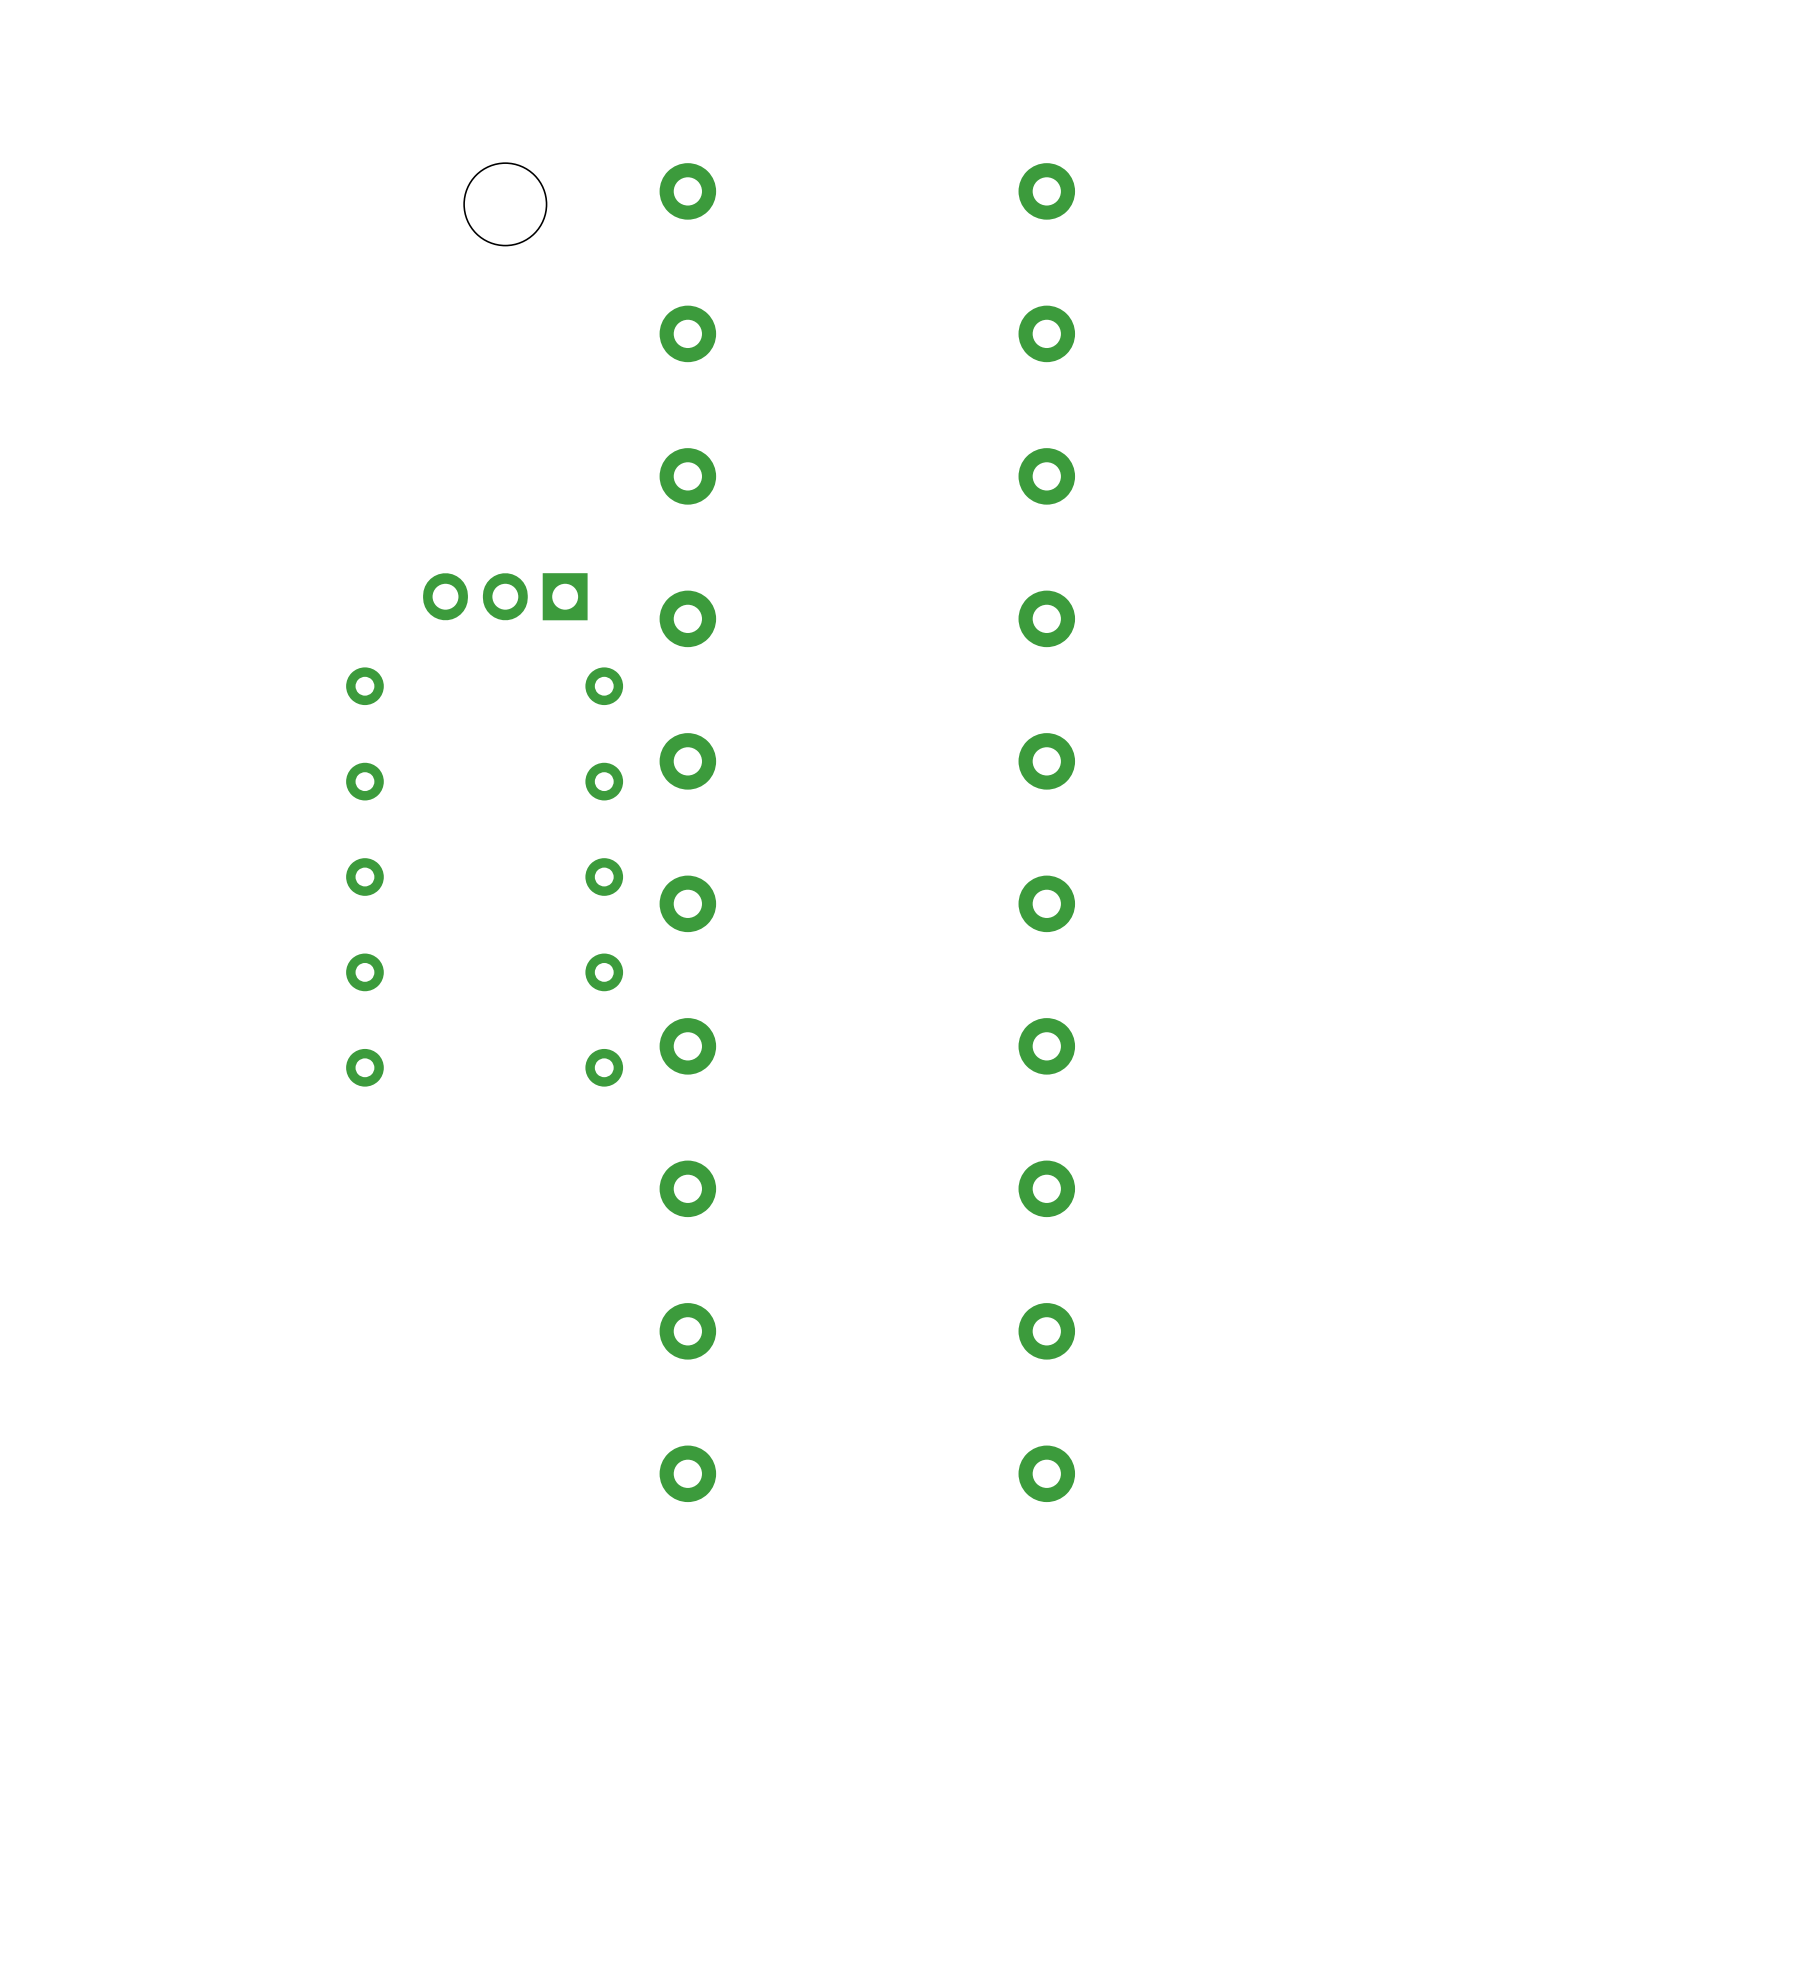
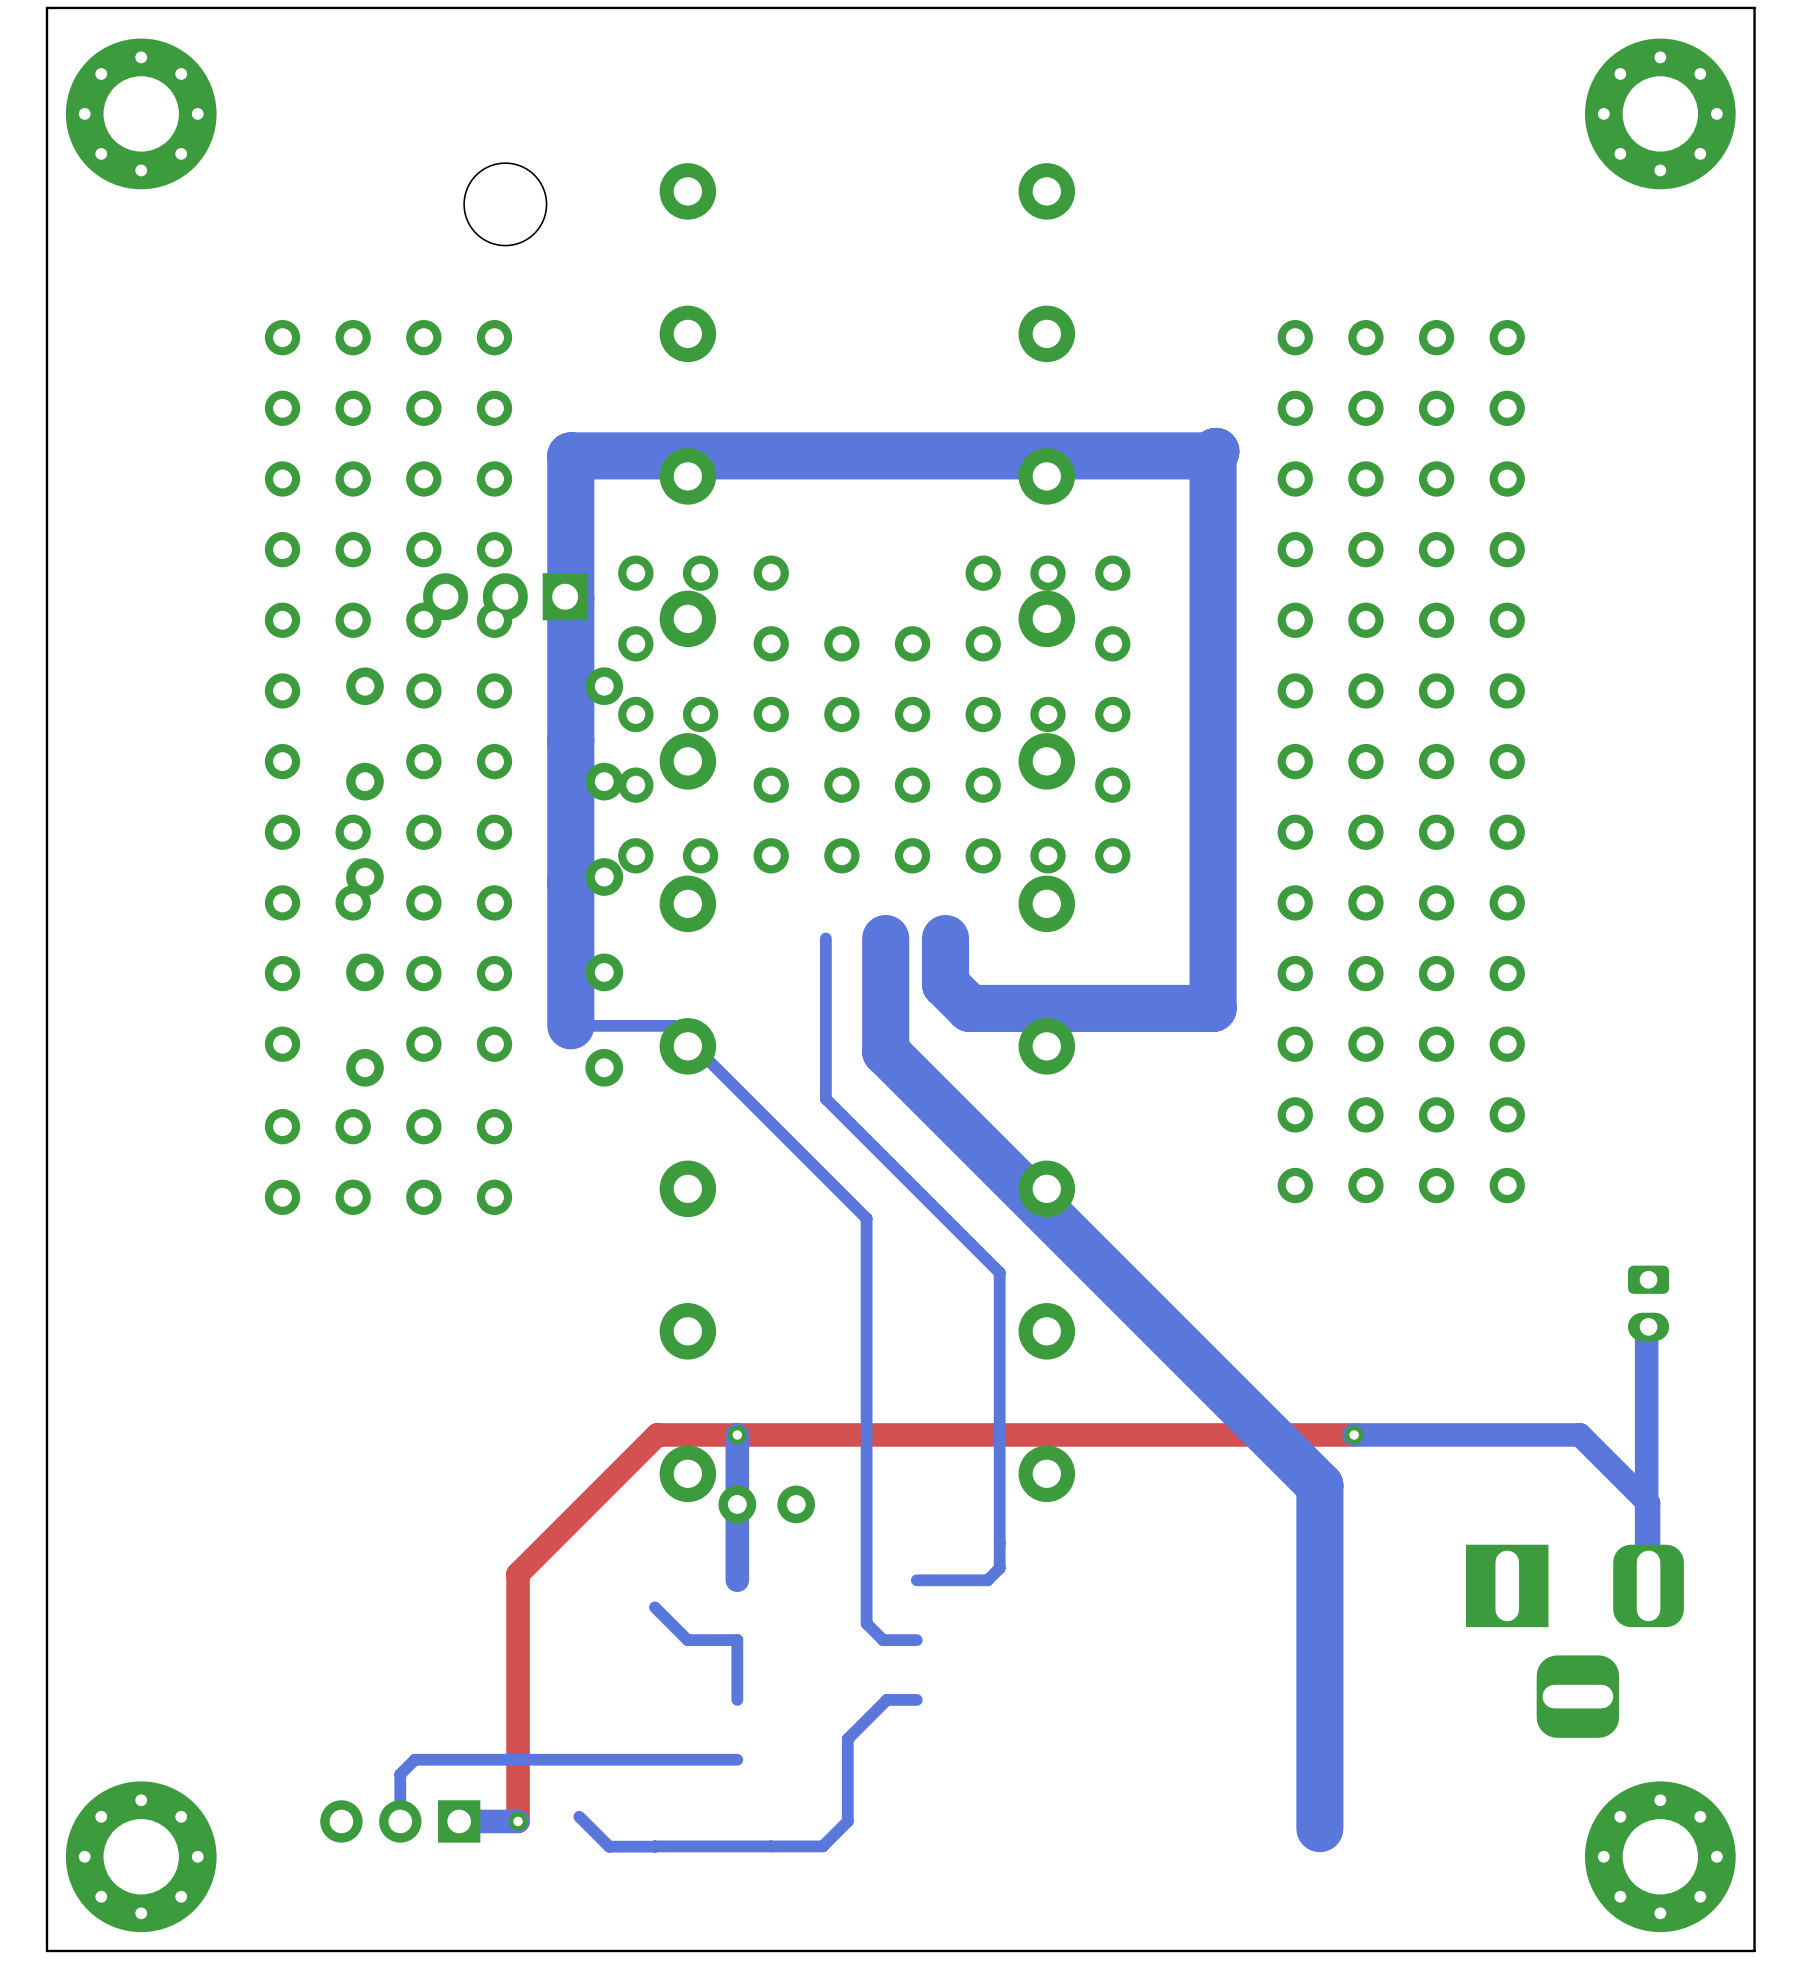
board edge: none -> (1754, 7) (47, 7) (47, 1950) (1754, 1950) (1754, 7)
part: none -> (141, 113)
part: none -> (1660, 113)
via: none -> (282, 337)
via: none -> (353, 337)
via: none -> (423, 337)
via: none -> (494, 337)
via: none -> (1295, 337)
via: none -> (1365, 337)
via: none -> (1436, 337)
via: none -> (1507, 337)
via: none -> (282, 408)
via: none -> (353, 408)
via: none -> (423, 408)
via: none -> (494, 408)
via: none -> (1295, 408)
via: none -> (1365, 408)
via: none -> (1436, 408)
via: none -> (1507, 408)
bottom track: none -> (1215, 451) (1211, 455) (570, 455) (570, 1025) (673, 1025) (866, 1218) (866, 1623) (883, 1640) (916, 1640)
bottom track: none -> (1213, 454) (1213, 1008) (969, 1008) (945, 984) (945, 938)
via: none -> (282, 478)
via: none -> (353, 478)
via: none -> (423, 478)
via: none -> (494, 478)
via: none -> (1295, 478)
via: none -> (1365, 478)
via: none -> (1436, 478)
via: none -> (1507, 478)
via: none -> (282, 549)
via: none -> (353, 549)
via: none -> (423, 549)
via: none -> (494, 549)
via: none -> (1295, 549)
via: none -> (1365, 549)
via: none -> (1436, 549)
via: none -> (1507, 549)
via: none -> (635, 573)
via: none -> (700, 573)
via: none -> (771, 573)
via: none -> (983, 573)
via: none -> (1047, 573)
via: none -> (1112, 573)
via: none -> (282, 620)
via: none -> (353, 620)
via: none -> (423, 620)
via: none -> (494, 620)
via: none -> (1295, 620)
via: none -> (1365, 620)
via: none -> (1436, 620)
via: none -> (1507, 620)
via: none -> (635, 643)
via: none -> (771, 643)
via: none -> (841, 643)
via: none -> (912, 643)
via: none -> (983, 643)
via: none -> (1112, 643)
via: none -> (282, 690)
via: none -> (423, 690)
via: none -> (494, 690)
via: none -> (1295, 690)
via: none -> (1365, 690)
via: none -> (1436, 690)
via: none -> (1507, 690)
via: none -> (635, 714)
via: none -> (700, 714)
via: none -> (771, 714)
via: none -> (841, 714)
via: none -> (912, 714)
via: none -> (983, 714)
via: none -> (1047, 714)
via: none -> (1112, 714)
via: none -> (282, 761)
via: none -> (423, 761)
via: none -> (494, 761)
via: none -> (1295, 761)
via: none -> (1365, 761)
via: none -> (1436, 761)
via: none -> (1507, 761)
via: none -> (635, 785)
via: none -> (771, 785)
via: none -> (841, 785)
via: none -> (912, 785)
via: none -> (983, 785)
via: none -> (1112, 785)
via: none -> (282, 832)
via: none -> (353, 832)
via: none -> (423, 832)
via: none -> (494, 832)
via: none -> (1295, 832)
via: none -> (1365, 832)
via: none -> (1436, 832)
via: none -> (1507, 832)
via: none -> (635, 855)
via: none -> (700, 855)
via: none -> (771, 855)
via: none -> (841, 855)
via: none -> (912, 855)
via: none -> (983, 855)
via: none -> (1047, 855)
via: none -> (1112, 855)
via: none -> (282, 902)
via: none -> (353, 902)
via: none -> (423, 902)
via: none -> (494, 902)
via: none -> (1295, 902)
via: none -> (1365, 902)
via: none -> (1436, 902)
via: none -> (1507, 902)
bottom track: none -> (825, 938) (825, 1098) (999, 1272) (999, 1568) (987, 1580) (916, 1580)
bottom track: none -> (885, 938) (885, 1051) (1319, 1485) (1319, 1828)
via: none -> (282, 973)
via: none -> (423, 973)
via: none -> (494, 973)
via: none -> (1295, 973)
via: none -> (1365, 973)
via: none -> (1436, 973)
via: none -> (1507, 973)
via: none -> (282, 1044)
via: none -> (423, 1044)
via: none -> (494, 1044)
via: none -> (1295, 1044)
via: none -> (1365, 1044)
via: none -> (1436, 1044)
via: none -> (1507, 1044)
via: none -> (1295, 1114)
via: none -> (1365, 1114)
via: none -> (1436, 1114)
via: none -> (1507, 1114)
via: none -> (282, 1126)
via: none -> (353, 1126)
via: none -> (423, 1126)
via: none -> (494, 1126)
via: none -> (1295, 1185)
via: none -> (1365, 1185)
via: none -> (1436, 1185)
via: none -> (1507, 1185)
via: none -> (282, 1197)
via: none -> (353, 1197)
via: none -> (423, 1197)
via: none -> (494, 1197)
part: none -> (1648, 1303)
bottom track: none -> (1648, 1326) (1646, 1328) (1646, 1584) (1648, 1585) (1648, 1503) (1580, 1434) (1354, 1434)
bottom track: none -> (737, 1434) (737, 1580)
via: none -> (737, 1434)
top track: none -> (1354, 1434) (657, 1434) (518, 1574) (518, 1821)
via: none -> (1354, 1434)
part: none -> (766, 1504)
bottom track: none -> (654, 1607) (687, 1640) (737, 1640) (737, 1699)
part: none -> (1574, 1641)
bottom track: none -> (916, 1699) (886, 1699) (847, 1739) (847, 1821) (822, 1846) (655, 1846)
bottom track: none -> (737, 1759) (414, 1759) (400, 1774) (400, 1821)
bottom track: none -> (579, 1816) (609, 1846) (654, 1846)
part: none -> (400, 1821)
bottom track: none -> (518, 1821) (459, 1821)
via: none -> (518, 1821)
part: none -> (141, 1856)
part: none -> (1660, 1856)

